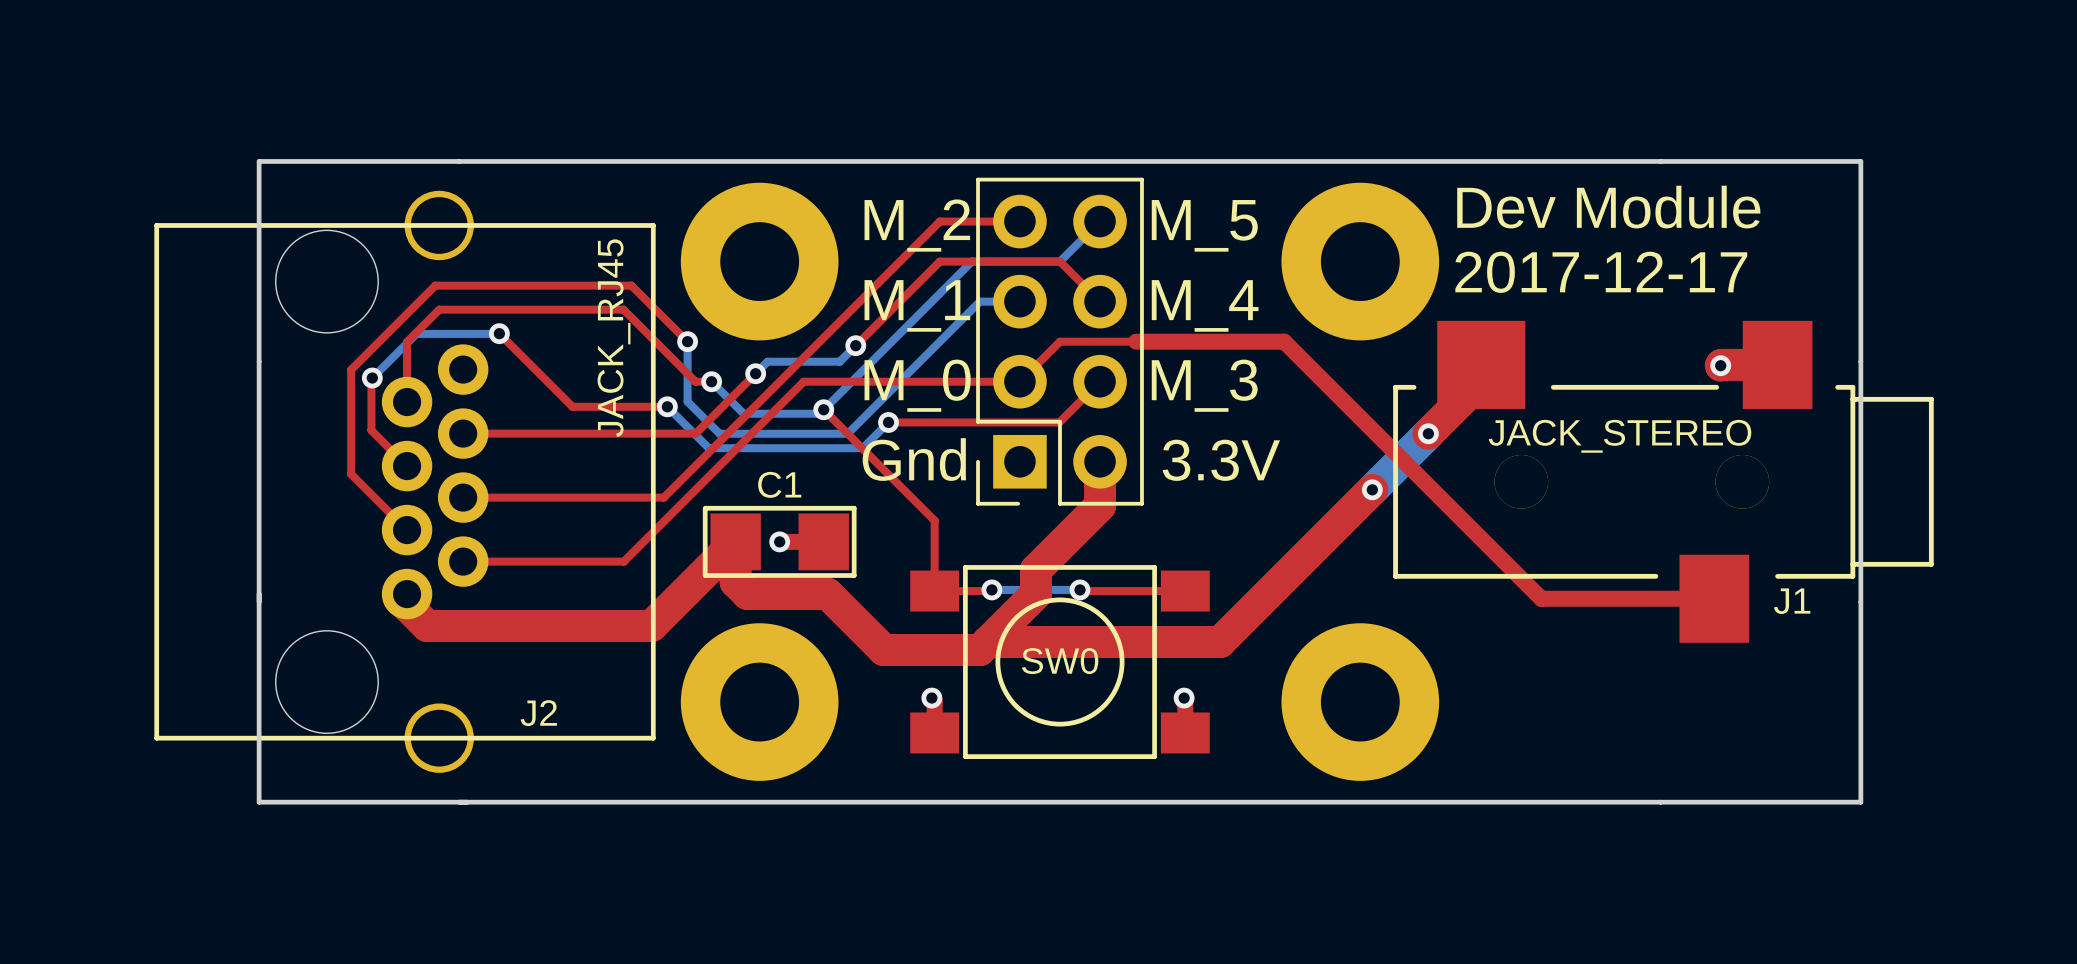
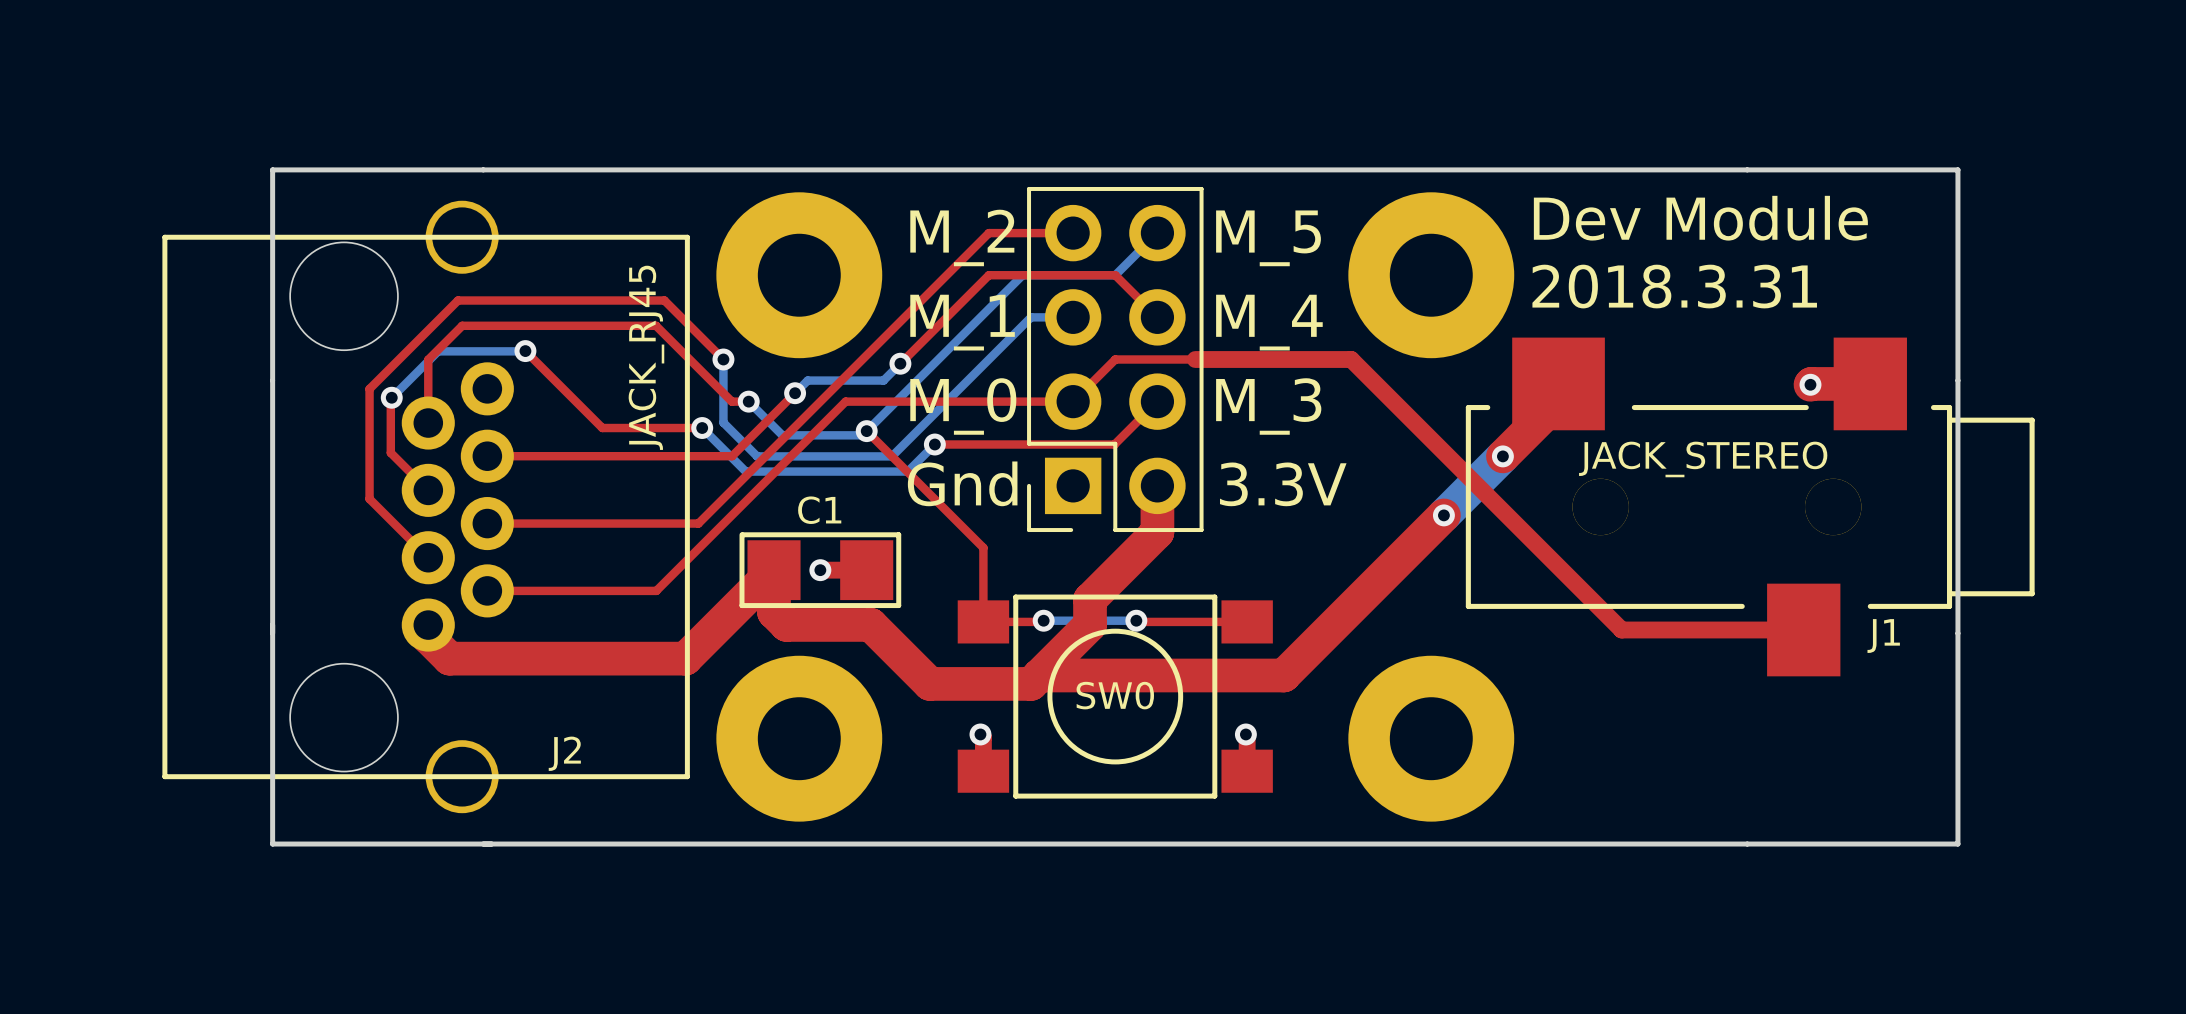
text: 2017-12-17 (1601, 272) -> 2018.3.31 (1674, 286)

